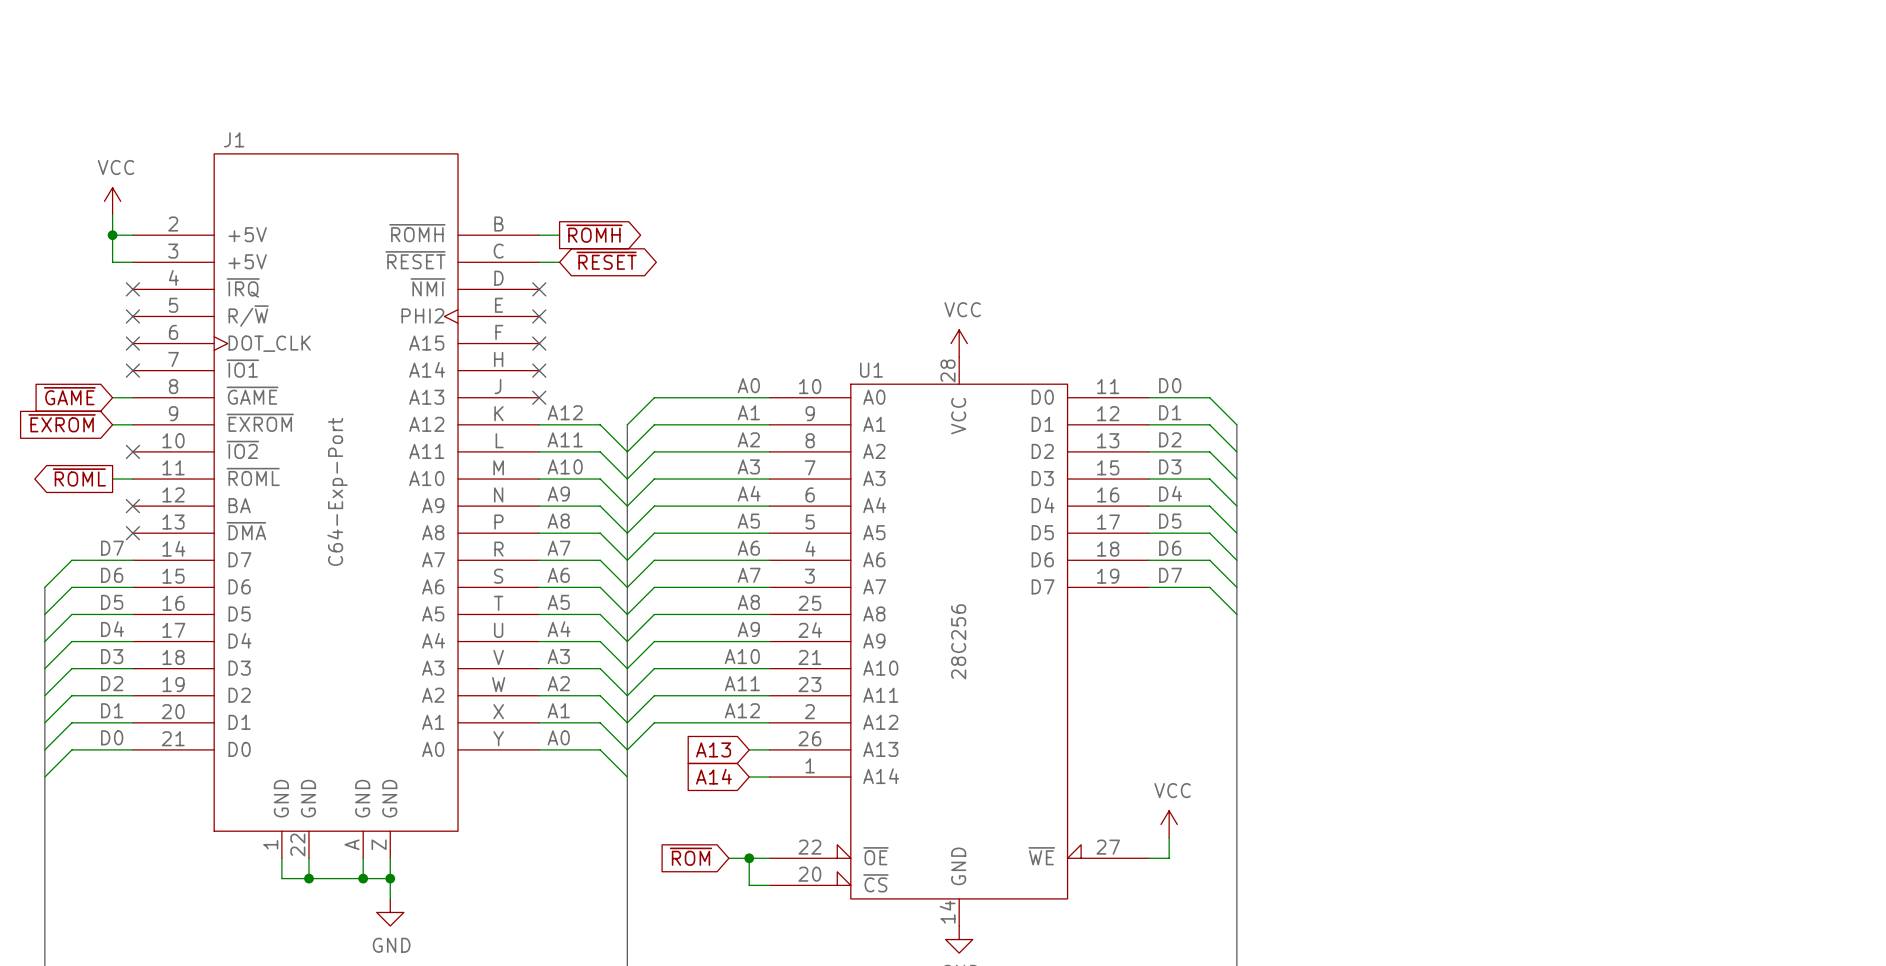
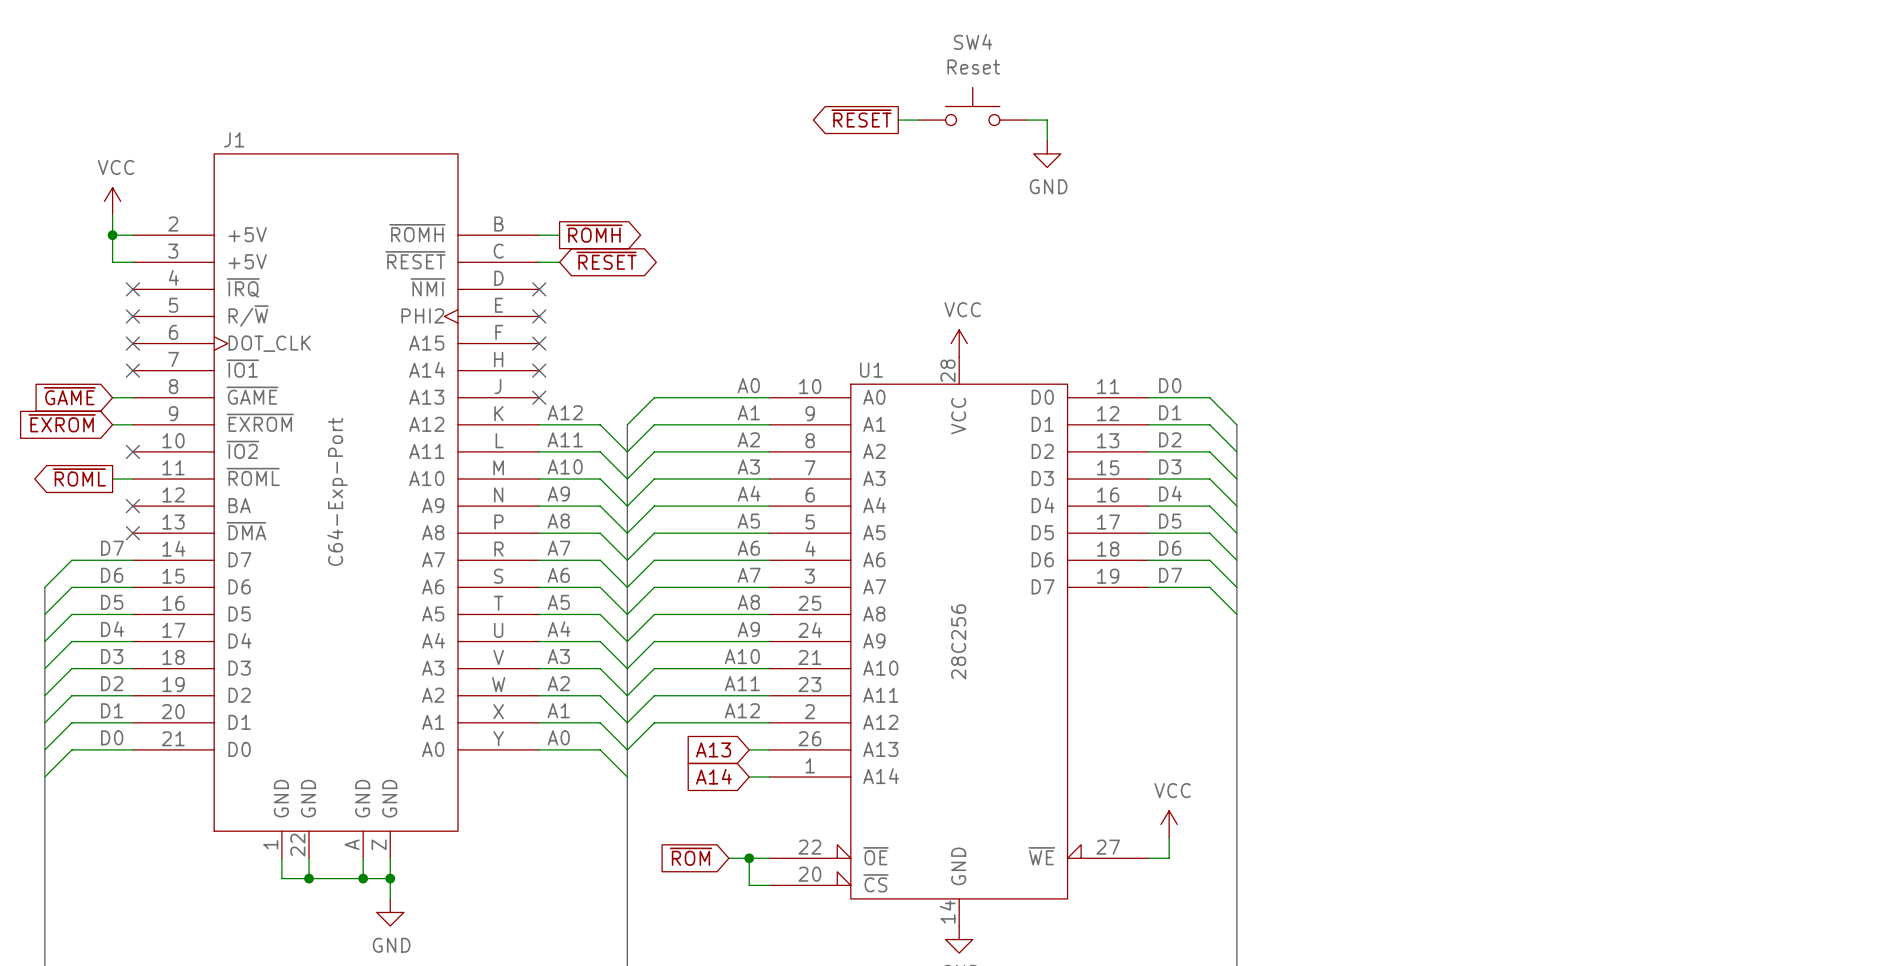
SW4: none -> Reset (972, 106)
global label: none -> ~{RESET} (861, 118)
wire: none -> (898, 120) (918, 120)
wire: none -> (1026, 120) (1047, 120) (1047, 140)
power symbol: none -> GND (1047, 153)

